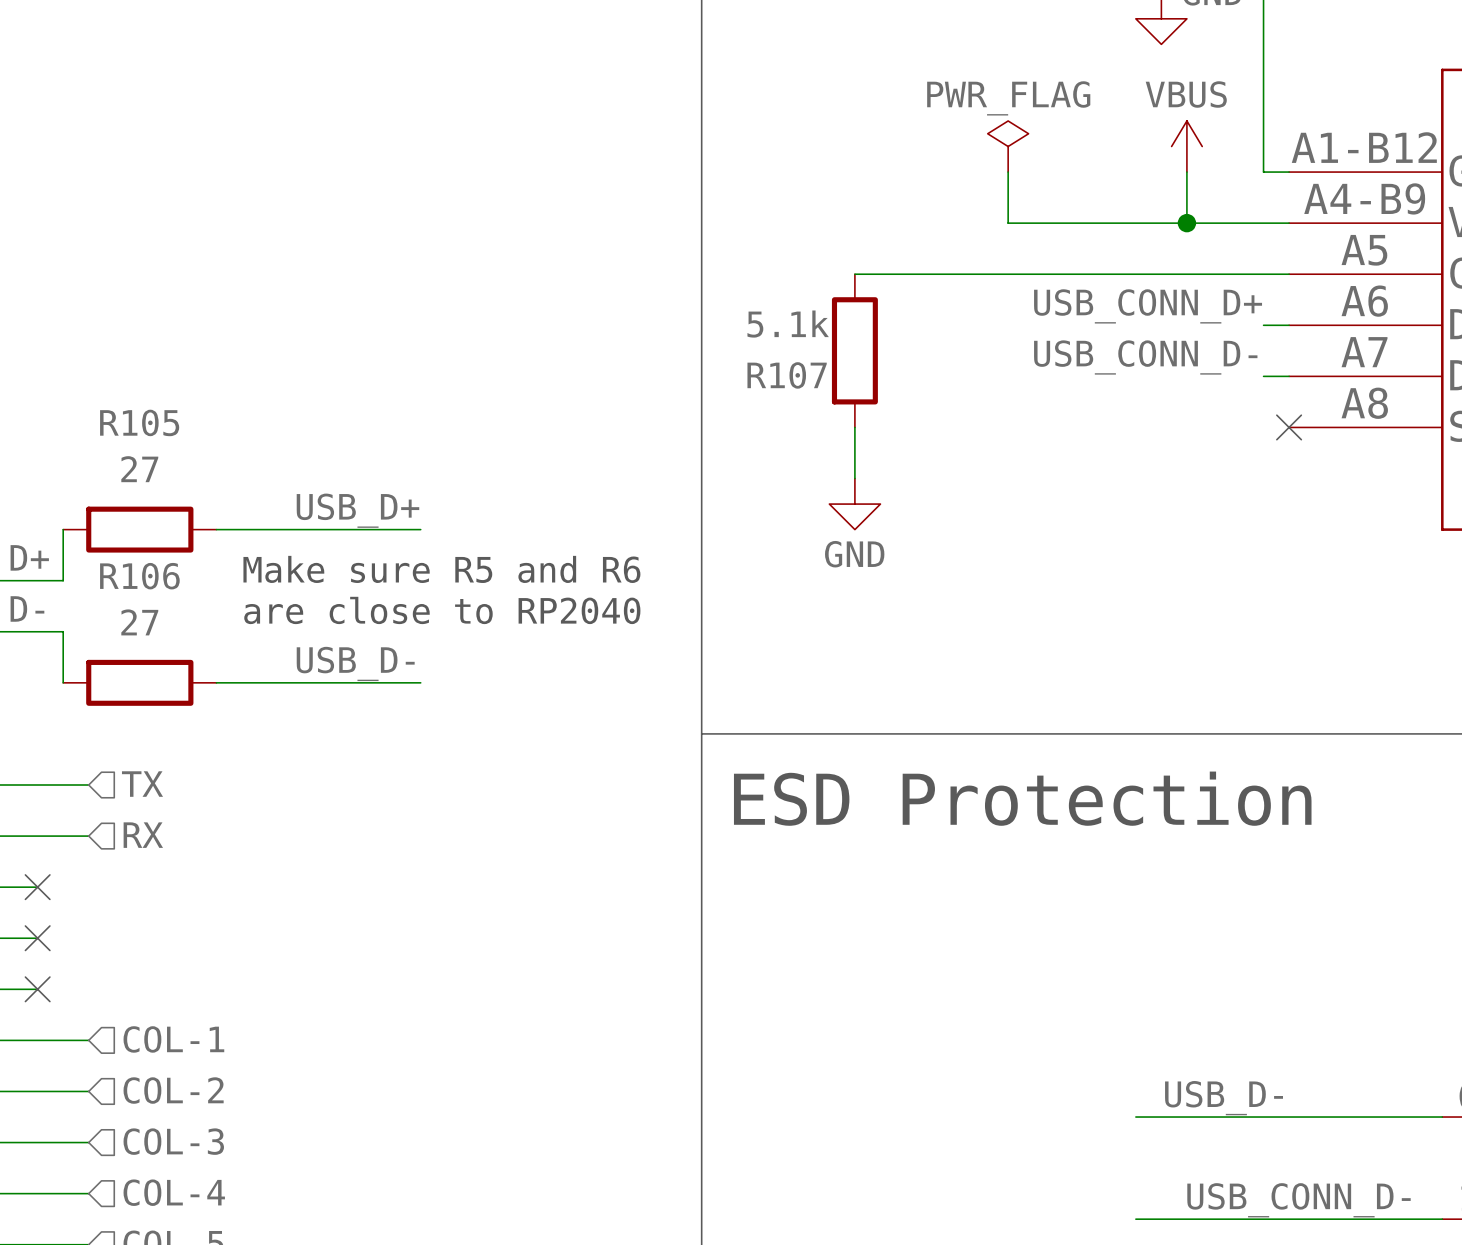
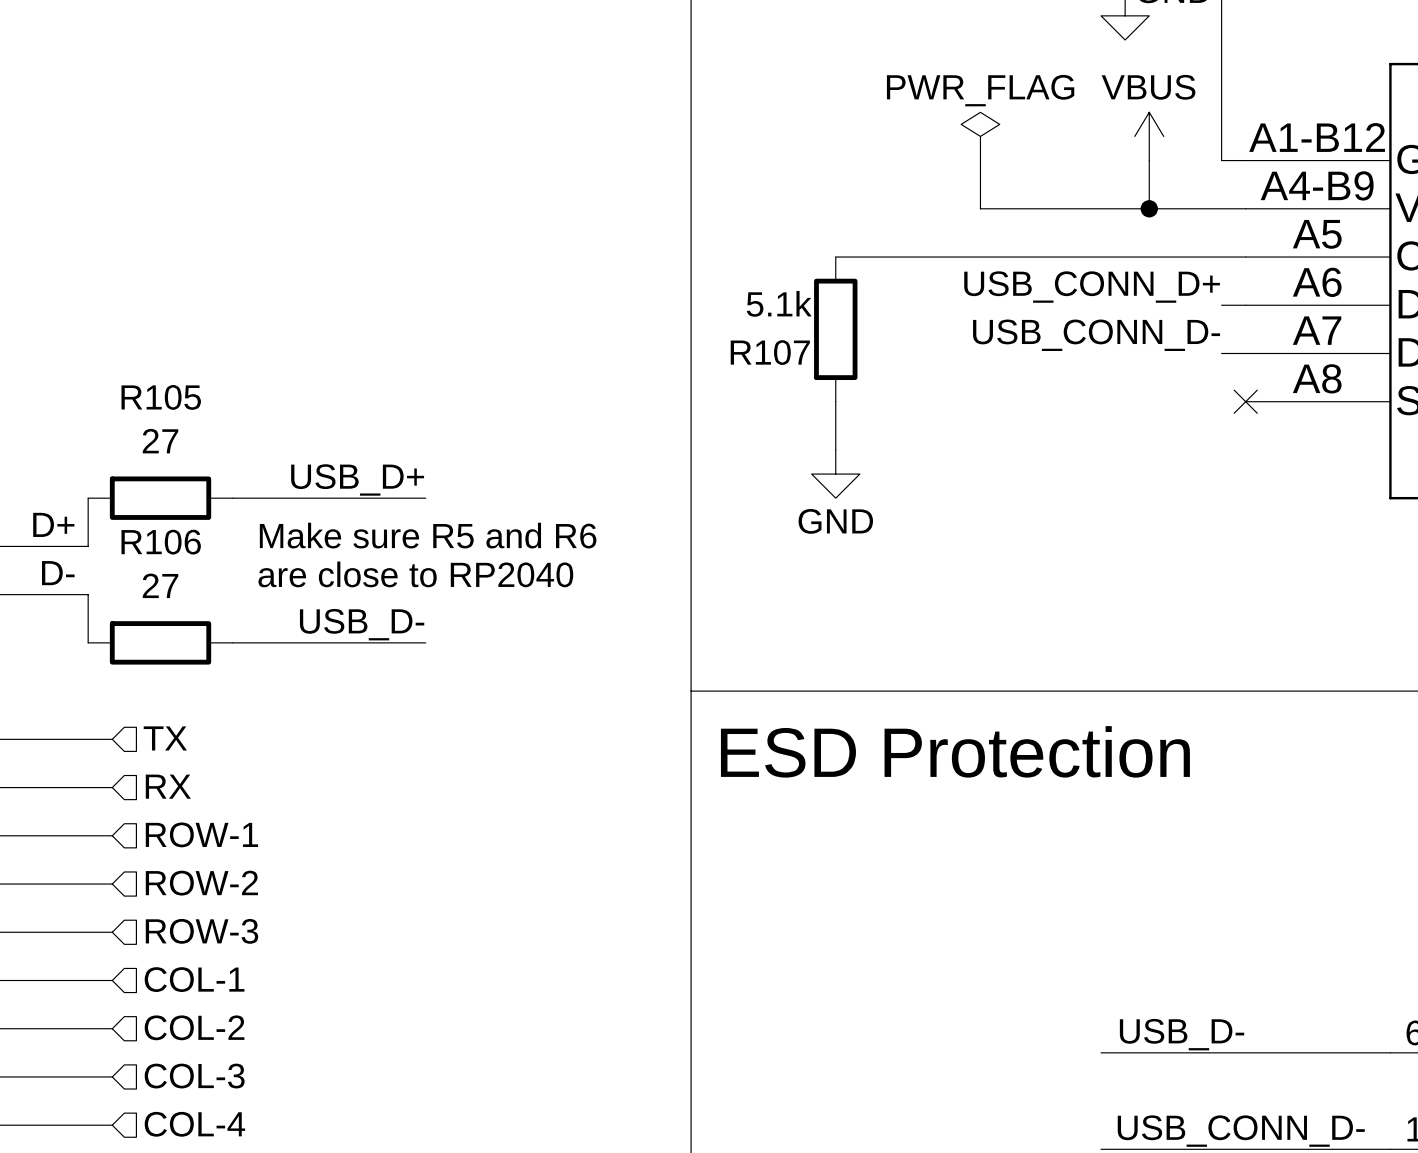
hierarchical label: none -> ROW-1 (201, 834)
wire: none -> (64, 835) (112, 835)
no-connect mark: (37, 887) -> none
hierarchical label: none -> ROW-2 (201, 883)
wire: none -> (64, 884) (112, 884)
no-connect mark: (37, 938) -> none
hierarchical label: none -> ROW-3 (202, 931)
wire: none -> (64, 932) (112, 932)
no-connect mark: (37, 989) -> none

